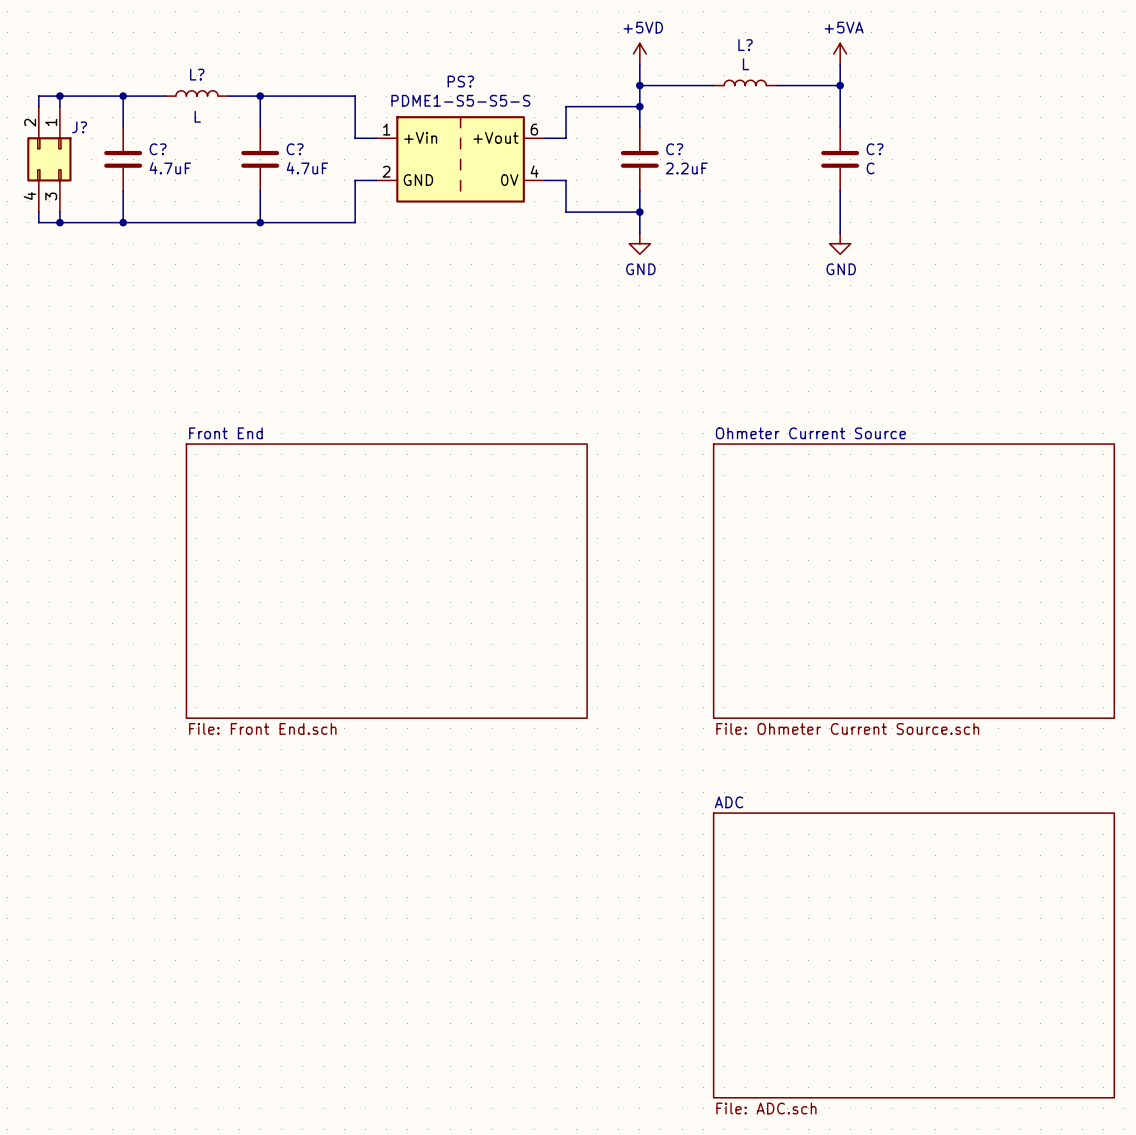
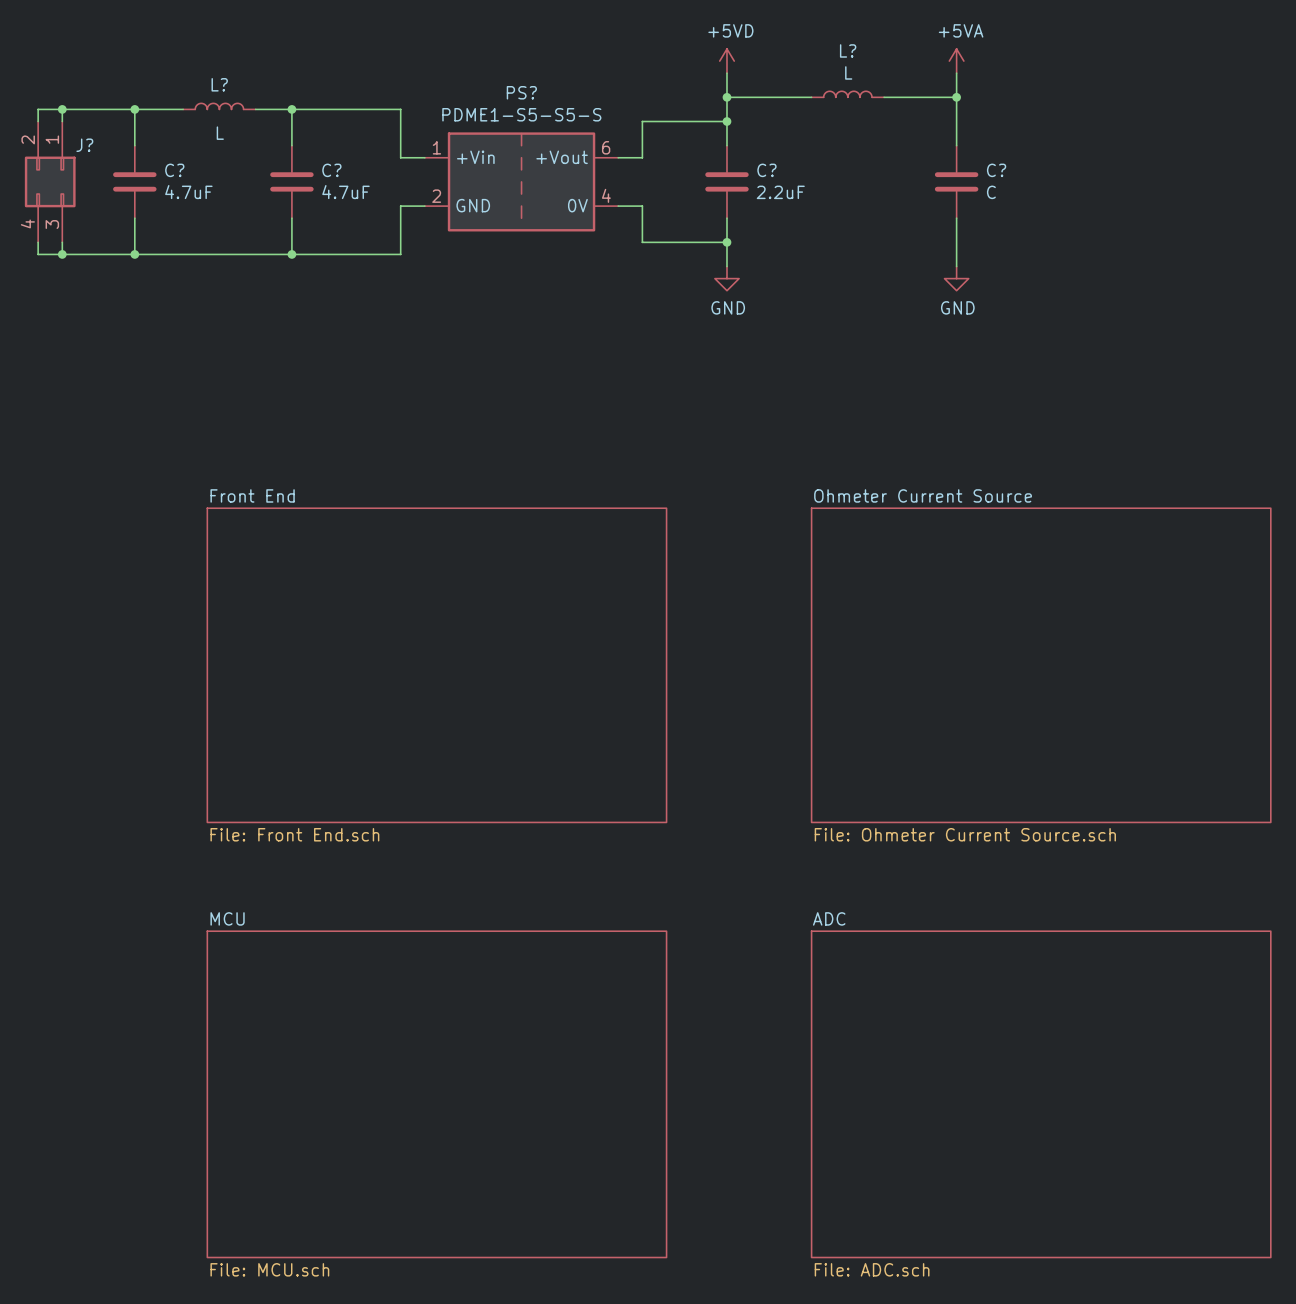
sheet MCU: none -> File: MCU.sch (436, 1094)

